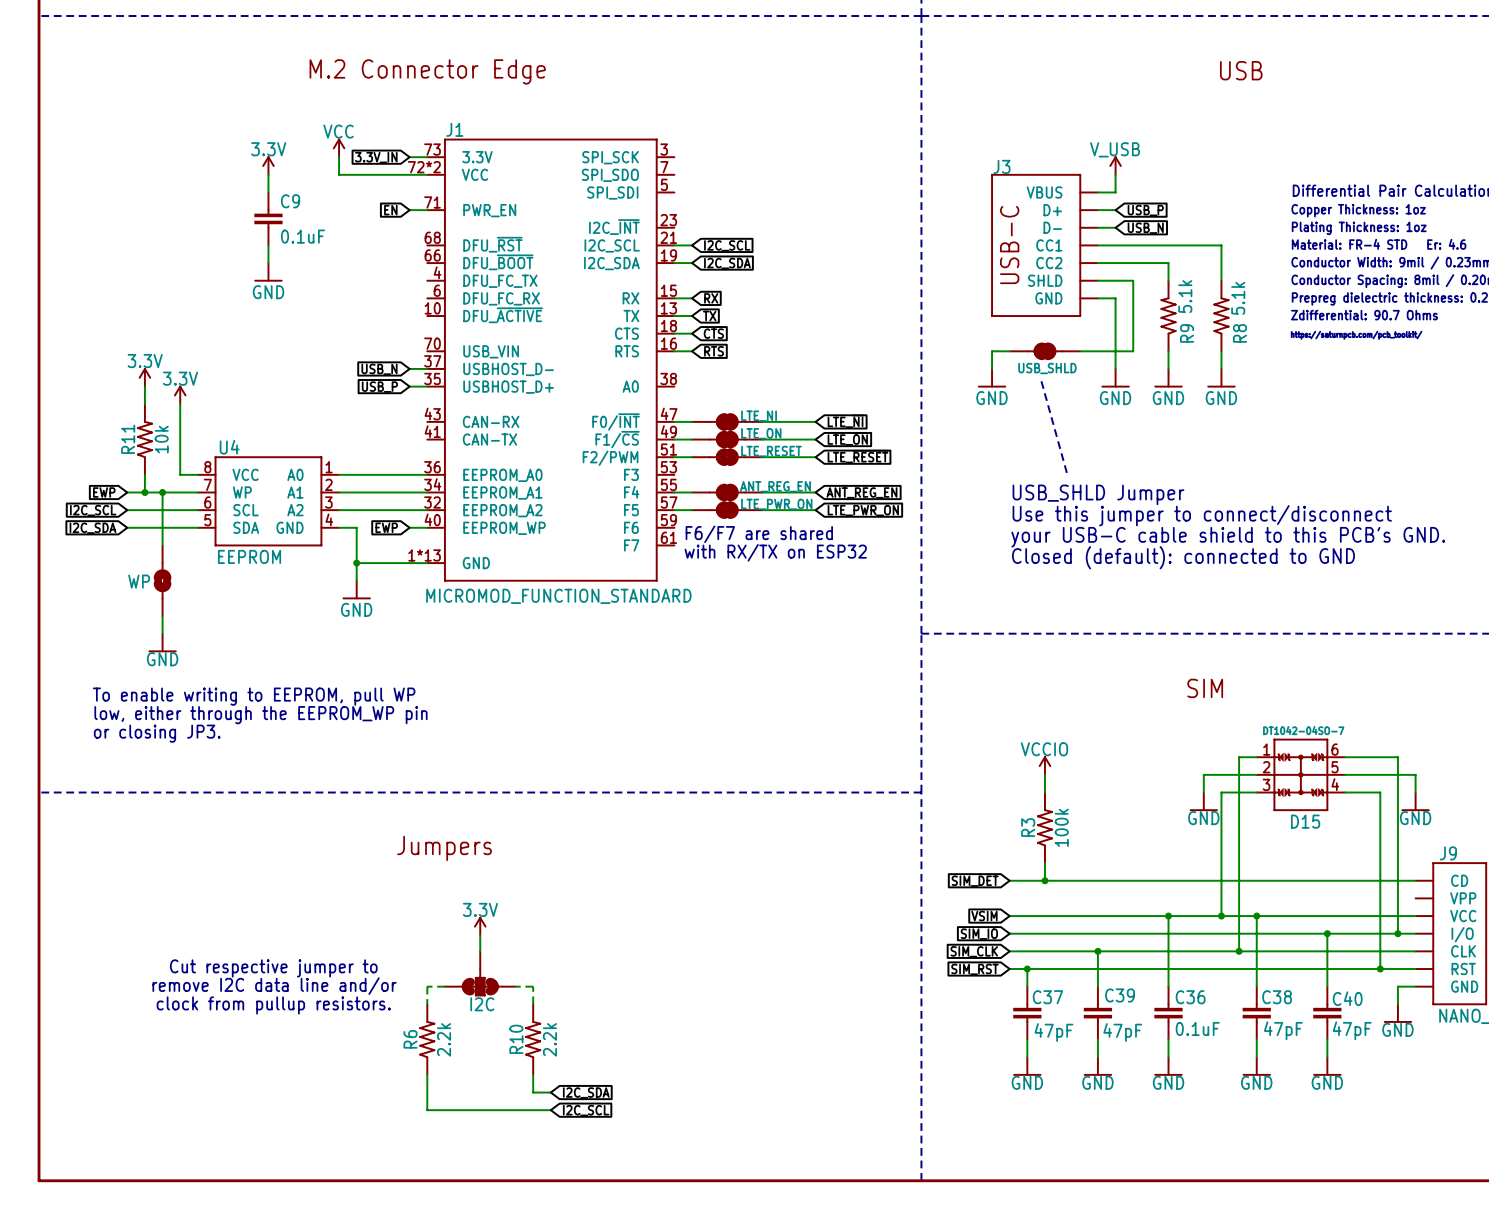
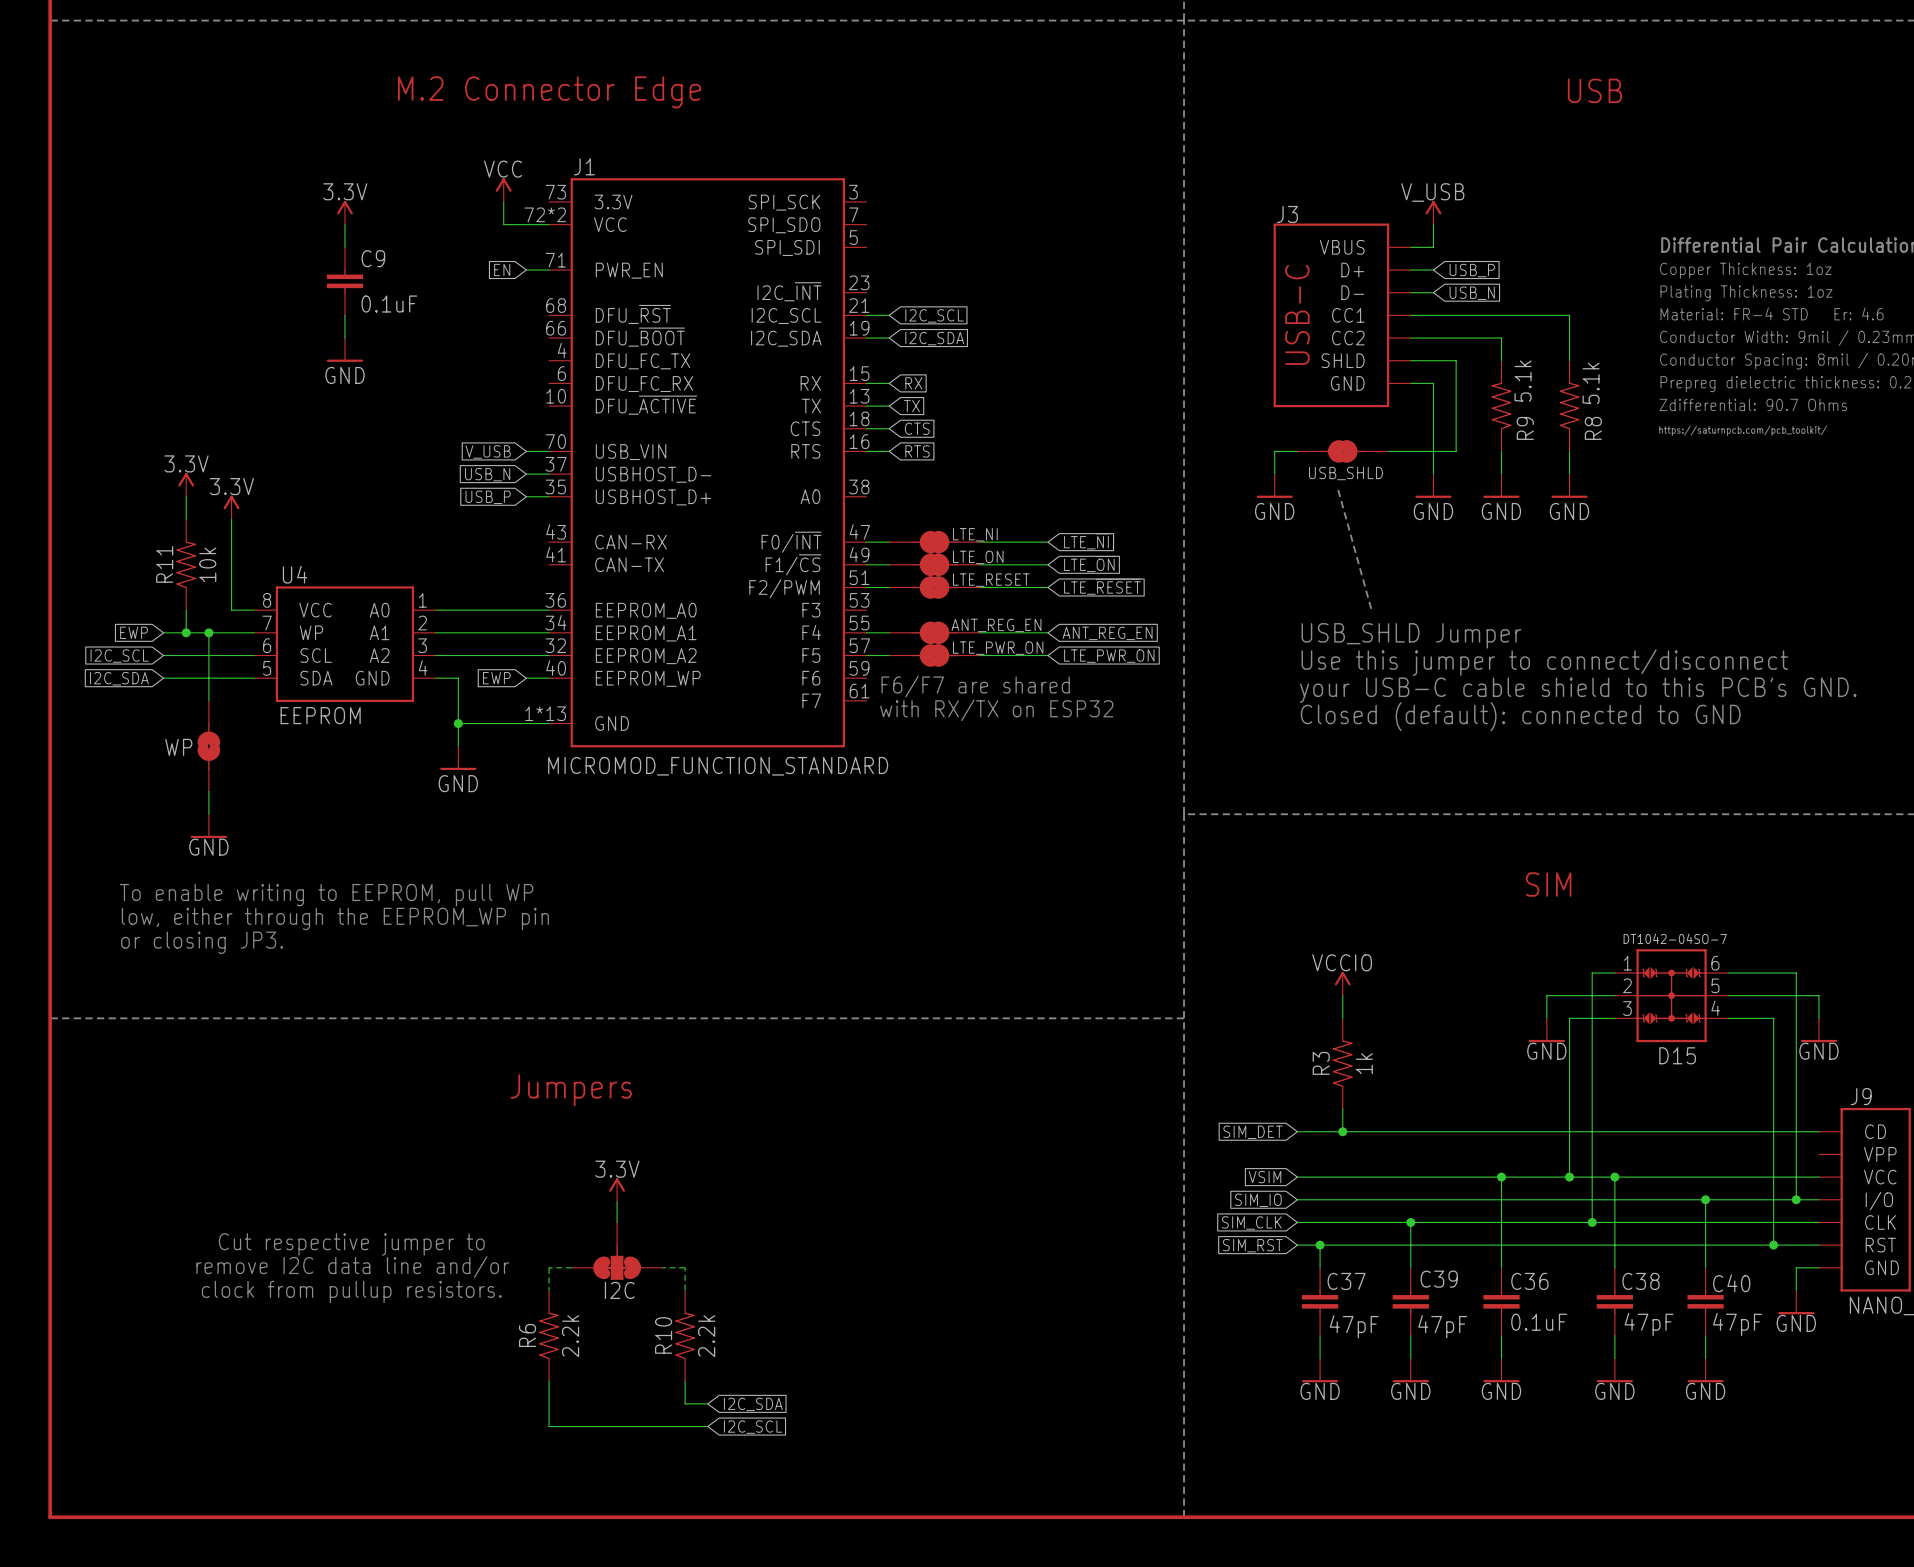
power symbol position: VCC (339, 147) -> VCC (503, 190)
wire: (339, 157) (339, 174) (392, 174) -> (503, 201) (503, 224)
global label: 3.3V_IN (376, 157) -> none
wire: (409, 157) (427, 157) -> none
global label: none -> V_USB (488, 451)
wire: none -> (526, 451) (549, 451)
R3 value: 100k (1061, 827) -> 1k (1364, 1063)

